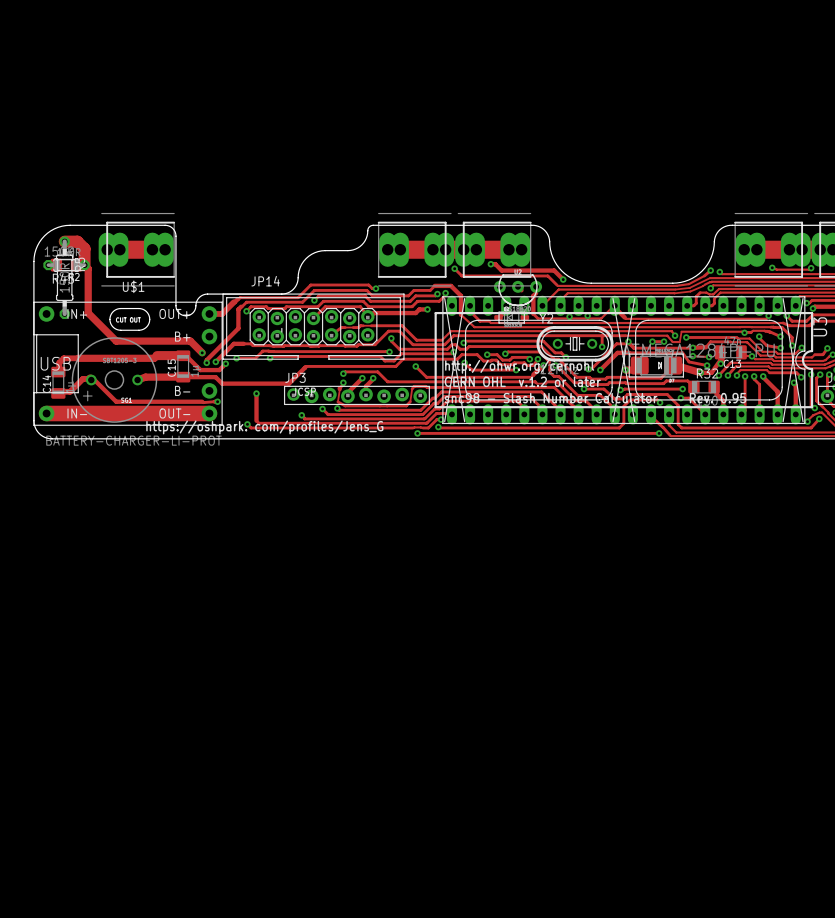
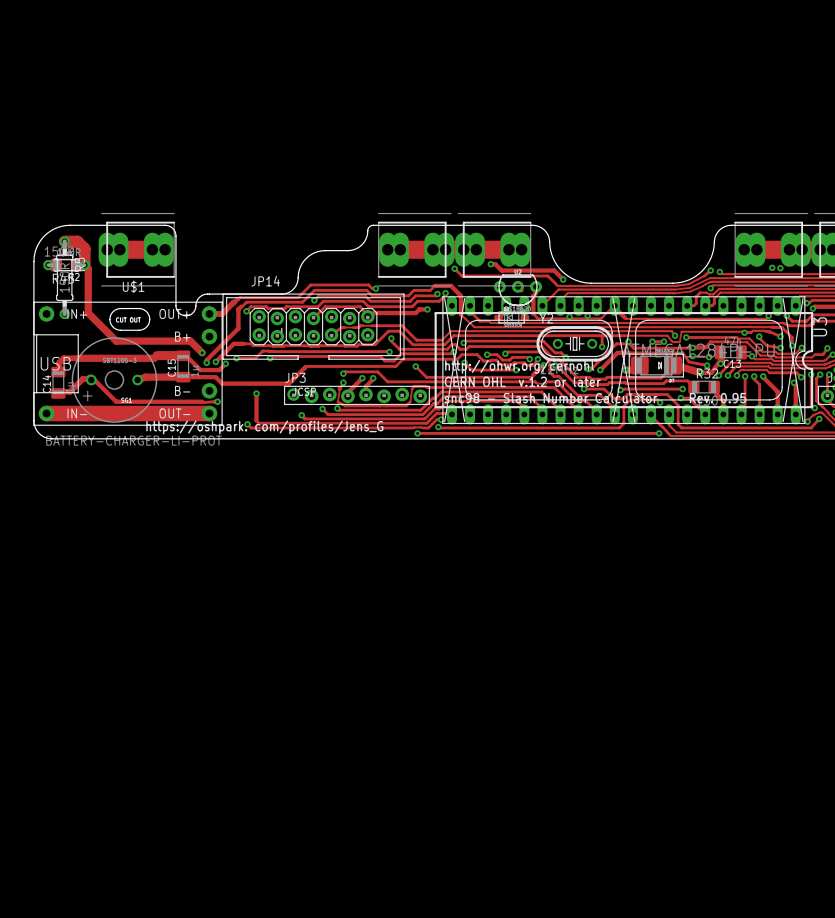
track: (772, 267) (776, 269) (811, 268) -> none
via position: (811, 268) -> (780, 268)

